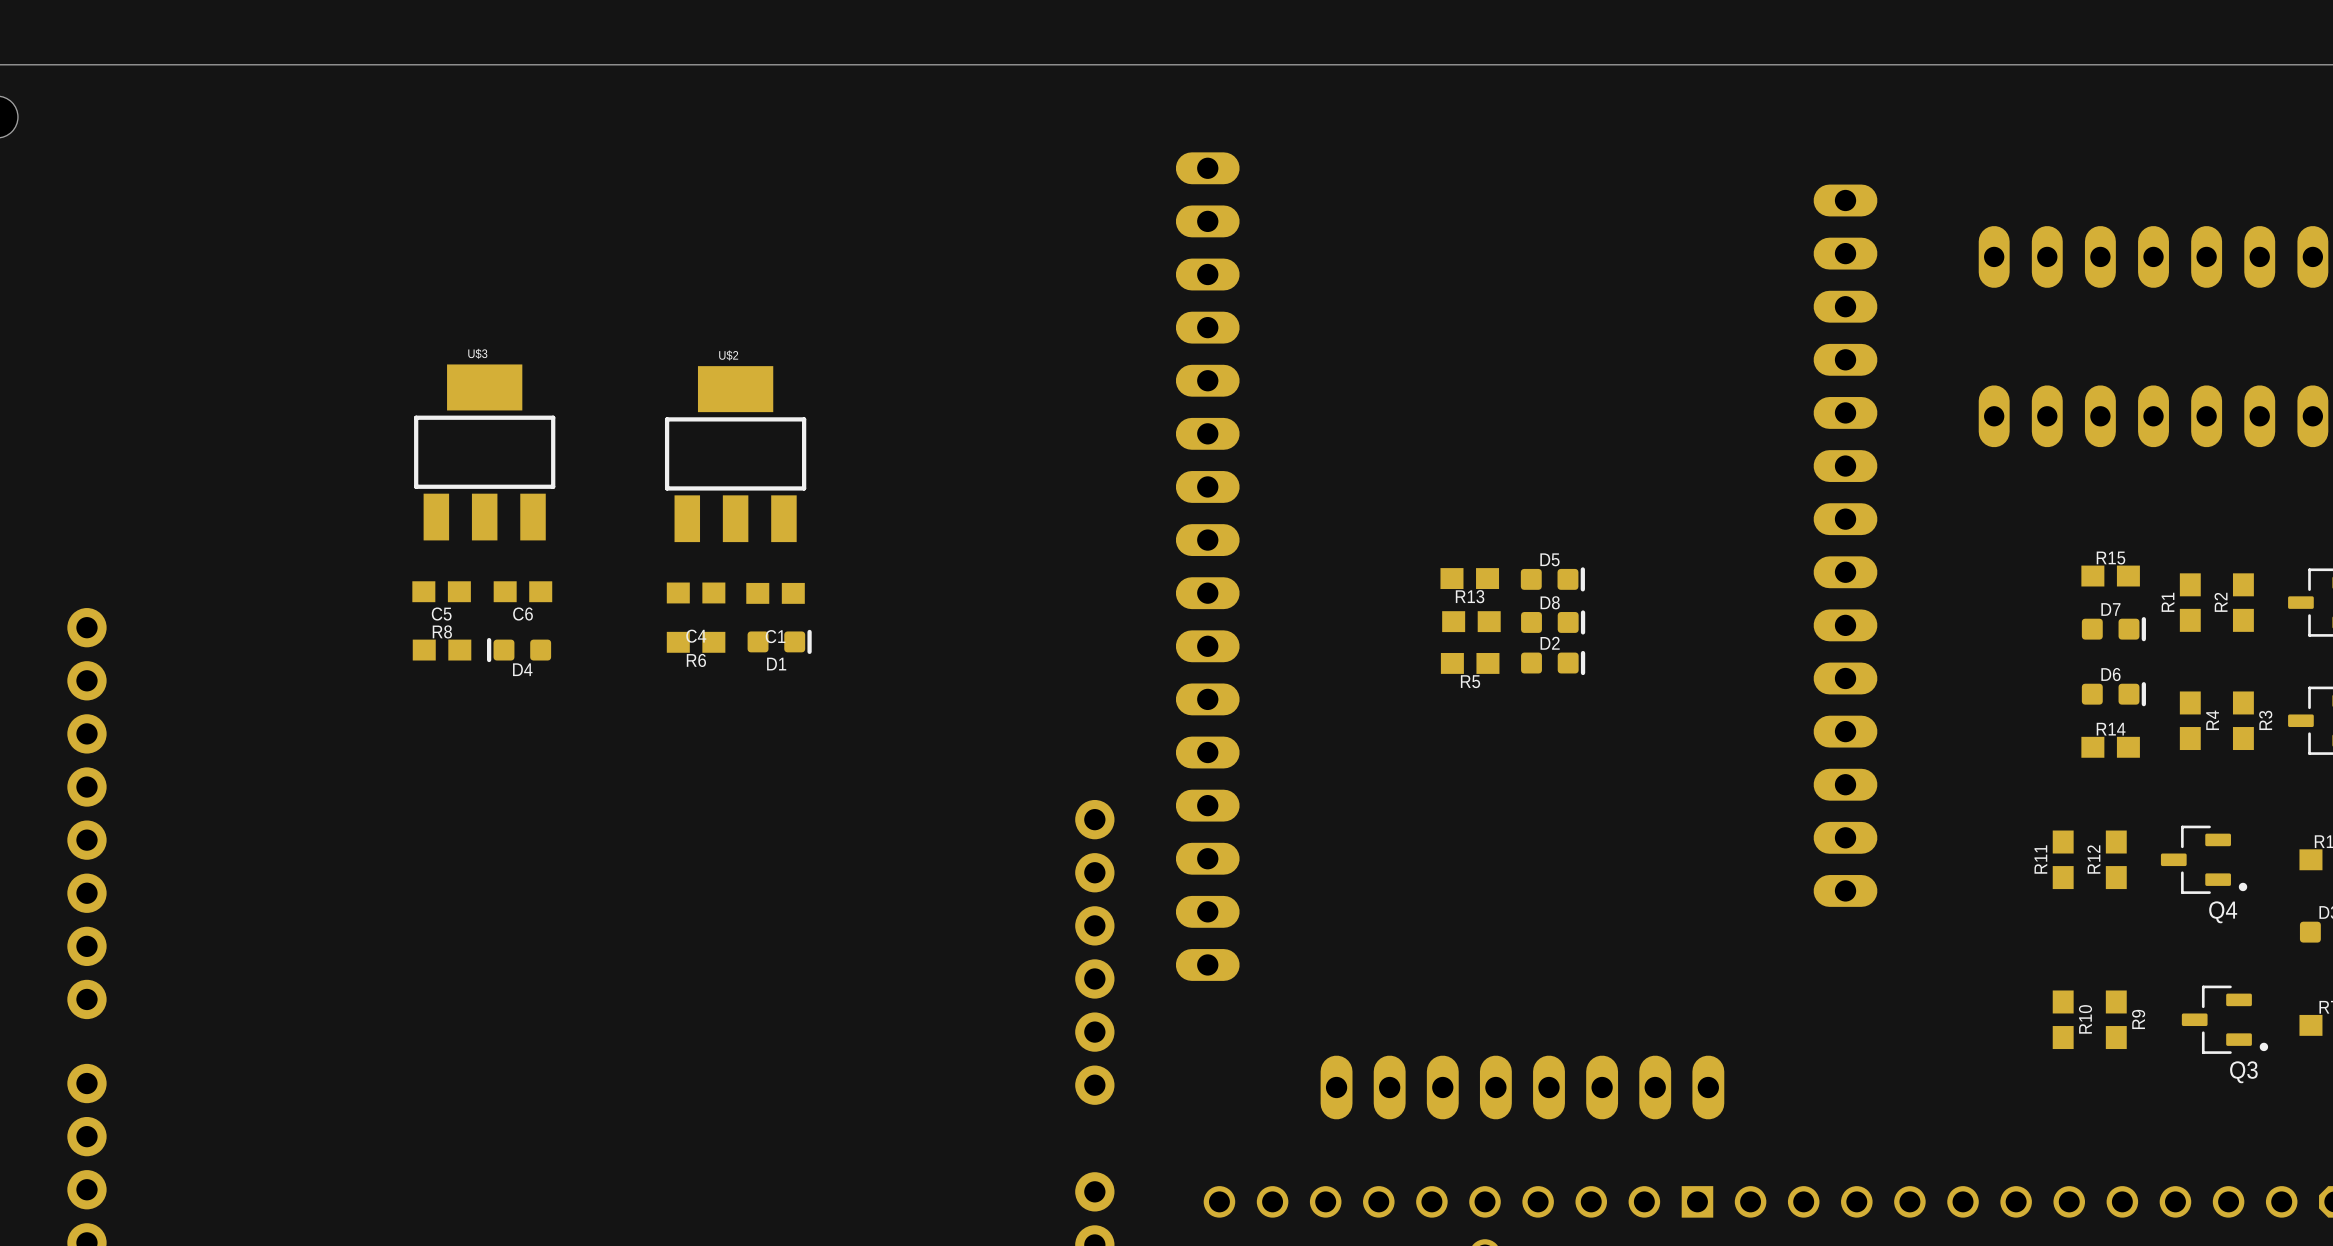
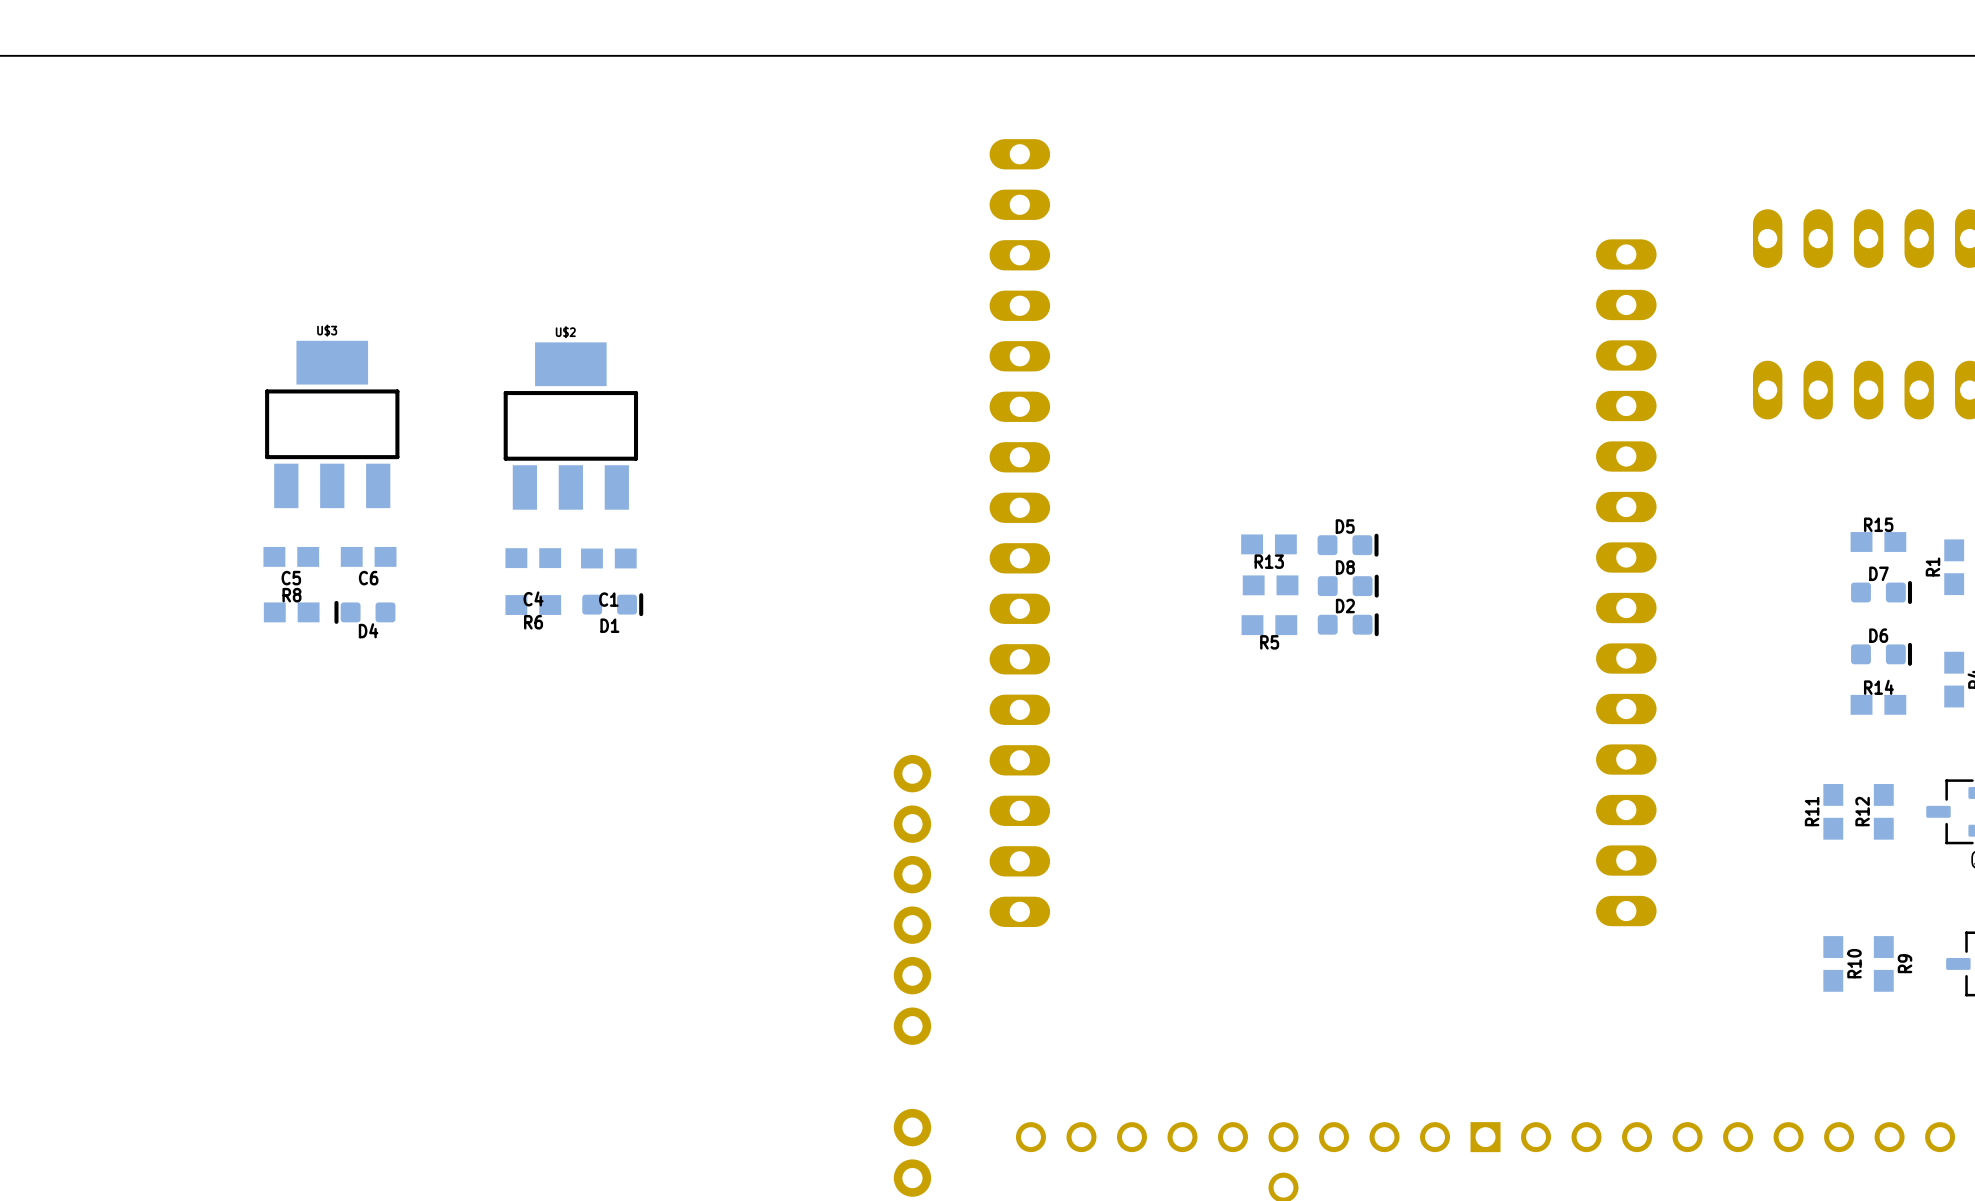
part position: (1845, 545) -> (1626, 582)
part: (1522, 1087) -> none

